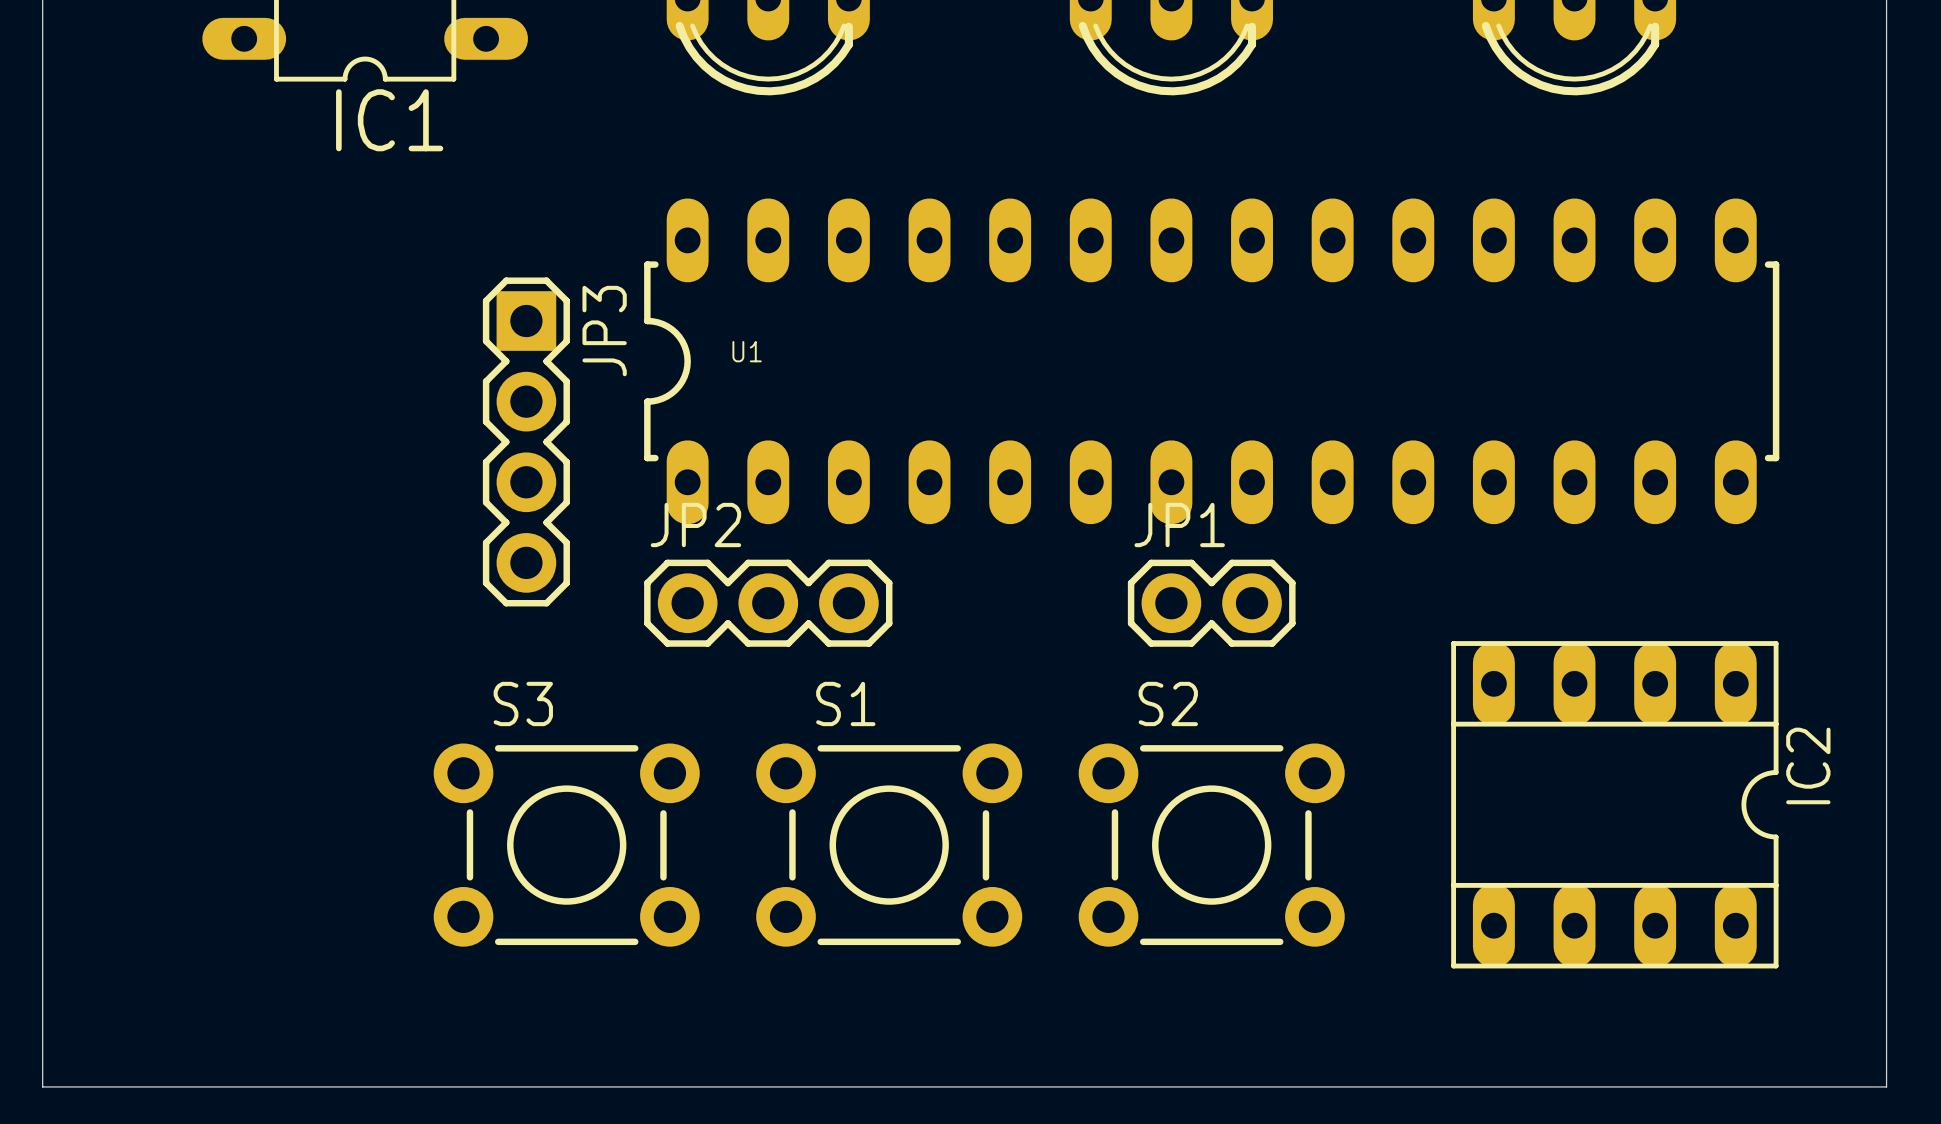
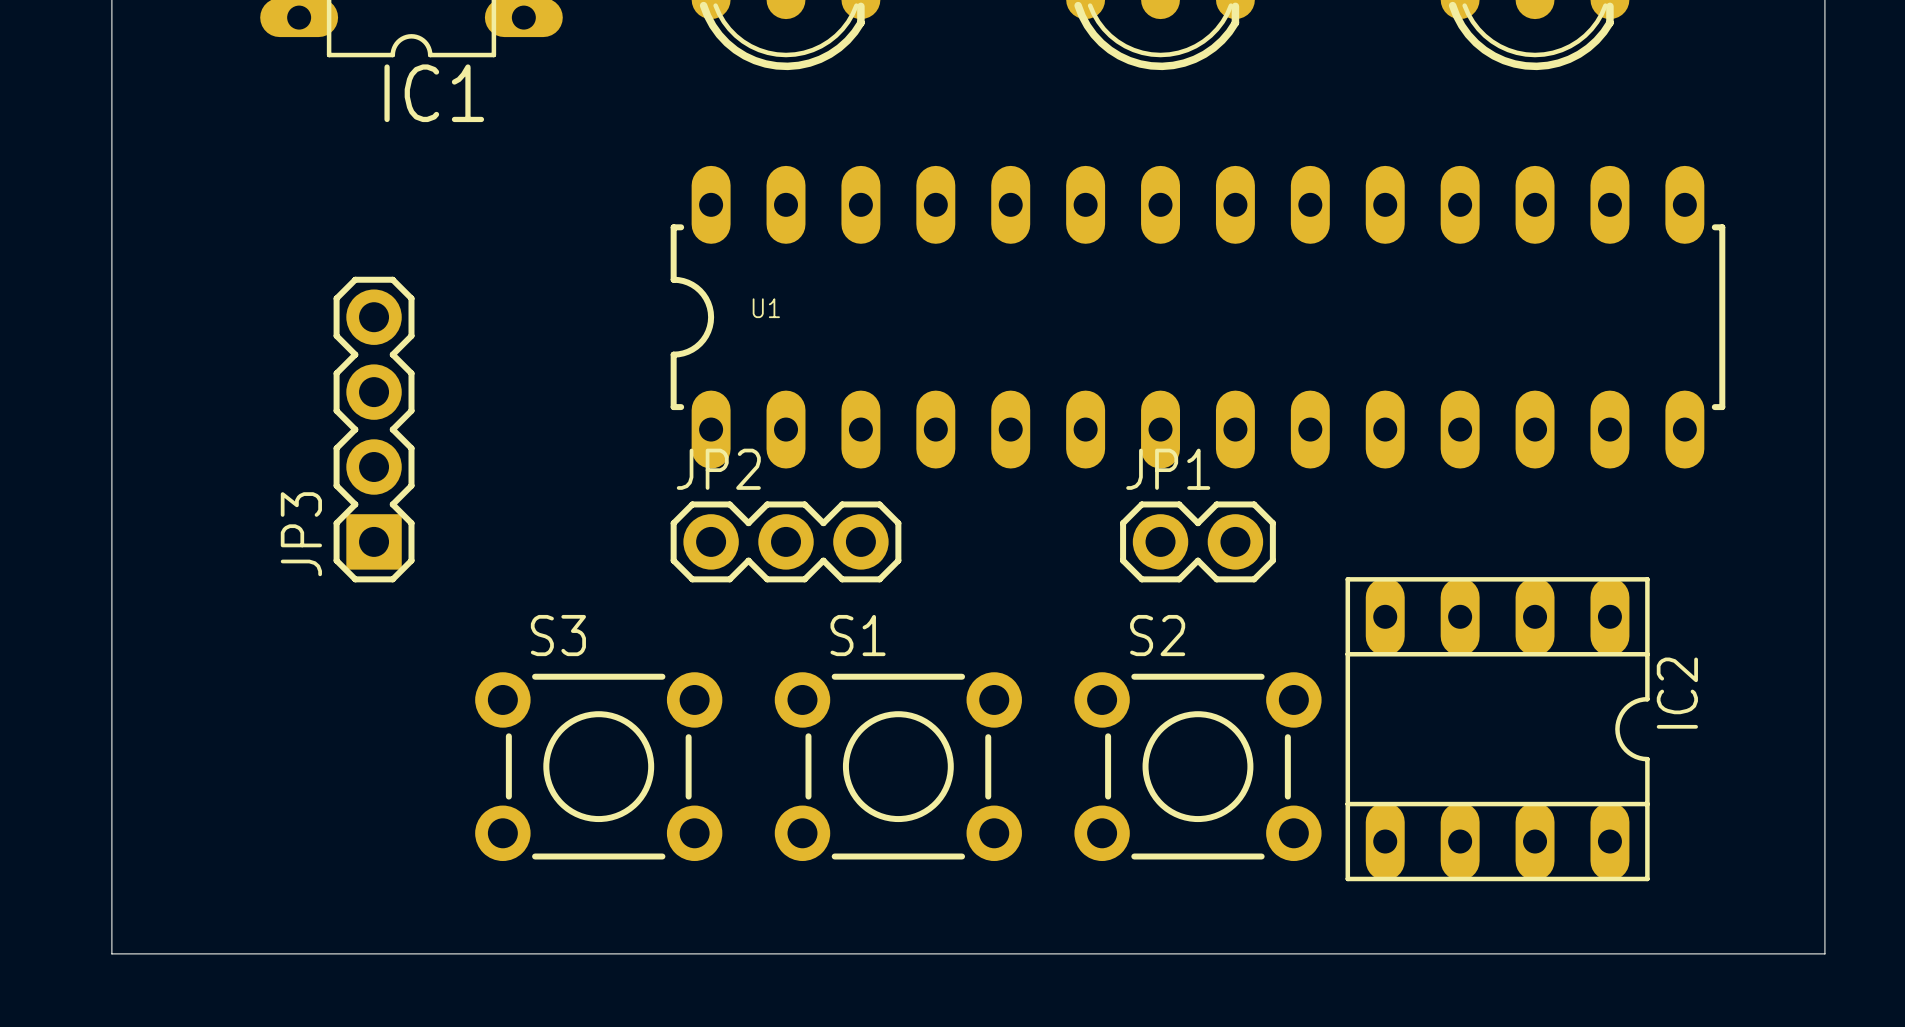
JP3 rotation: 0° (526, 441) -> 180° (374, 429)
JP3 position: (526, 441) -> (374, 429)
IC2 position: (1614, 804) -> (1497, 729)
board edge: (42, 1046) (42, 1086) (1886, 1086) (1886, 1046) -> (111, 953) (1824, 953)

